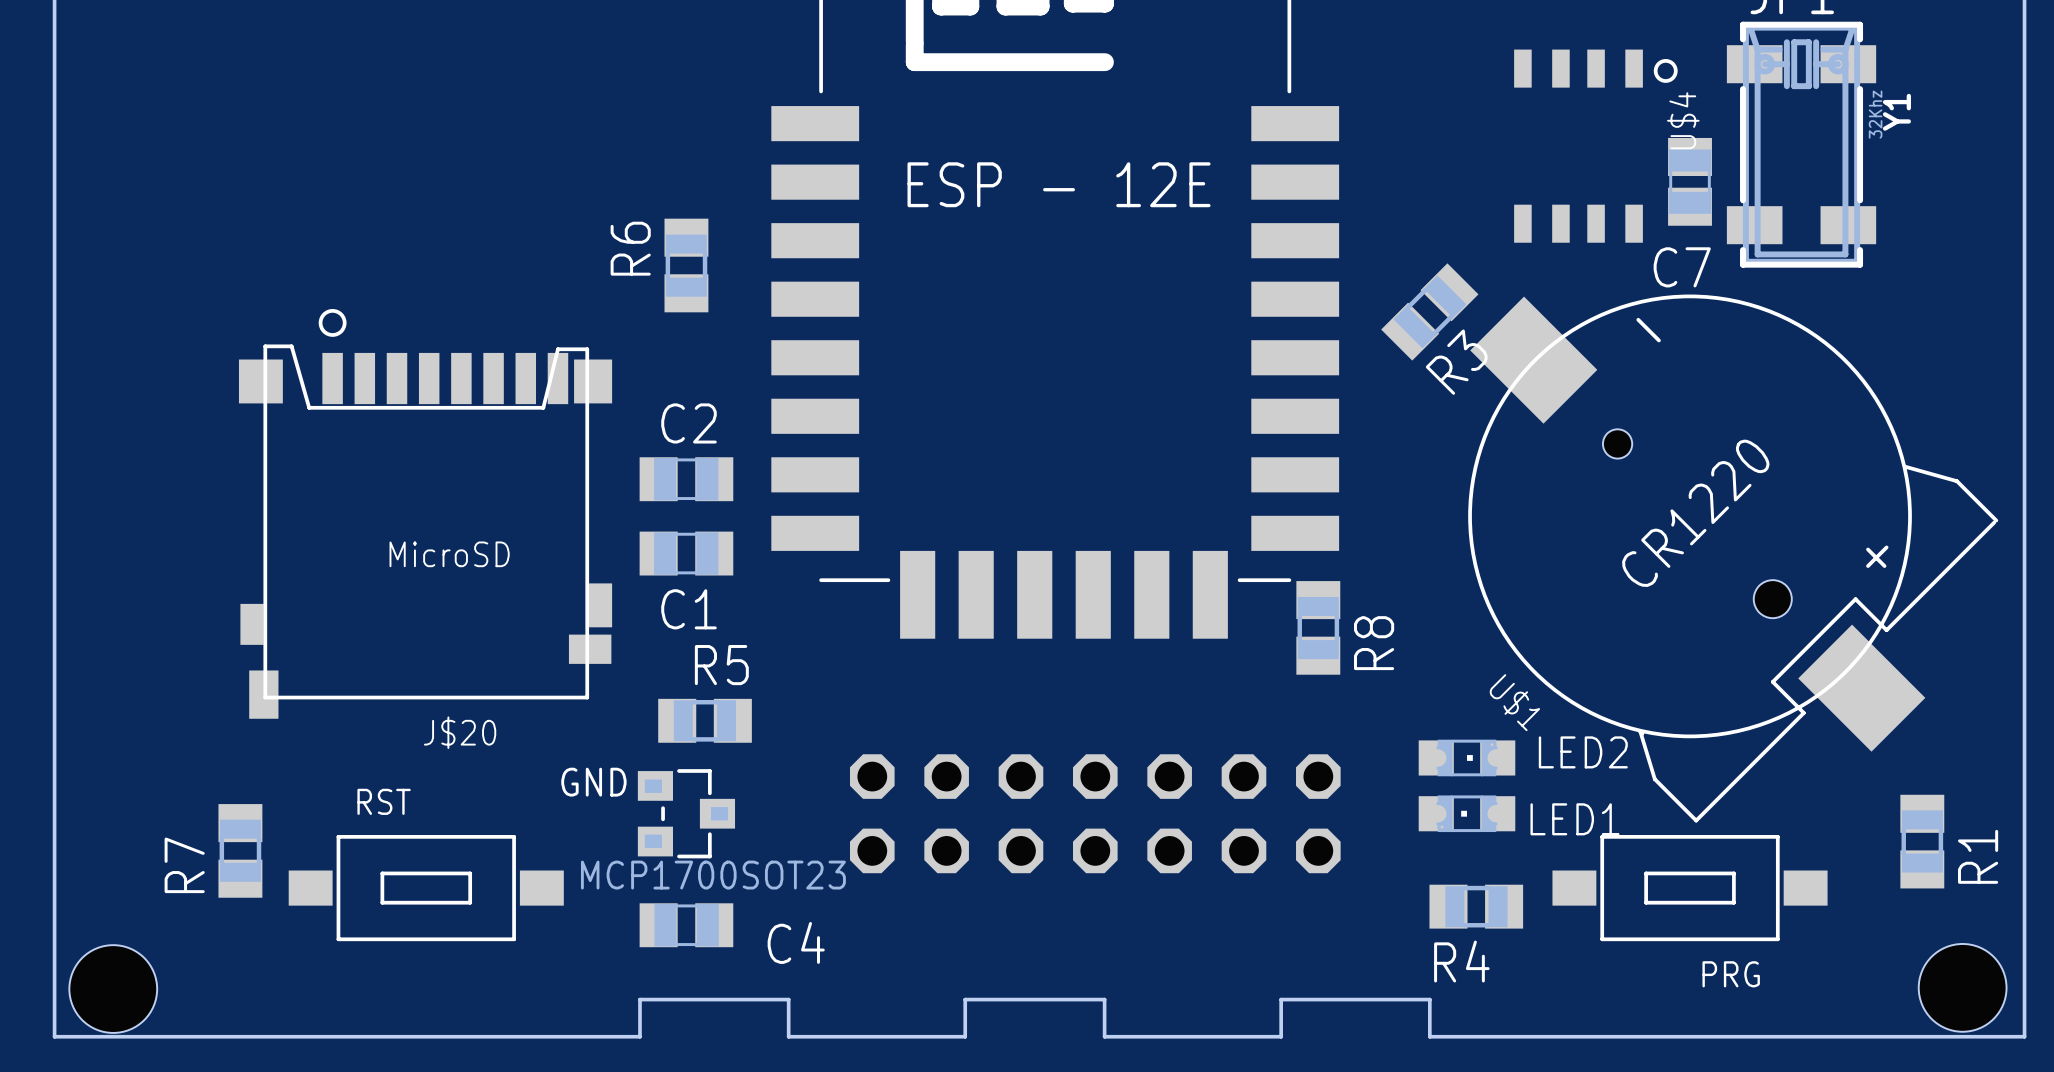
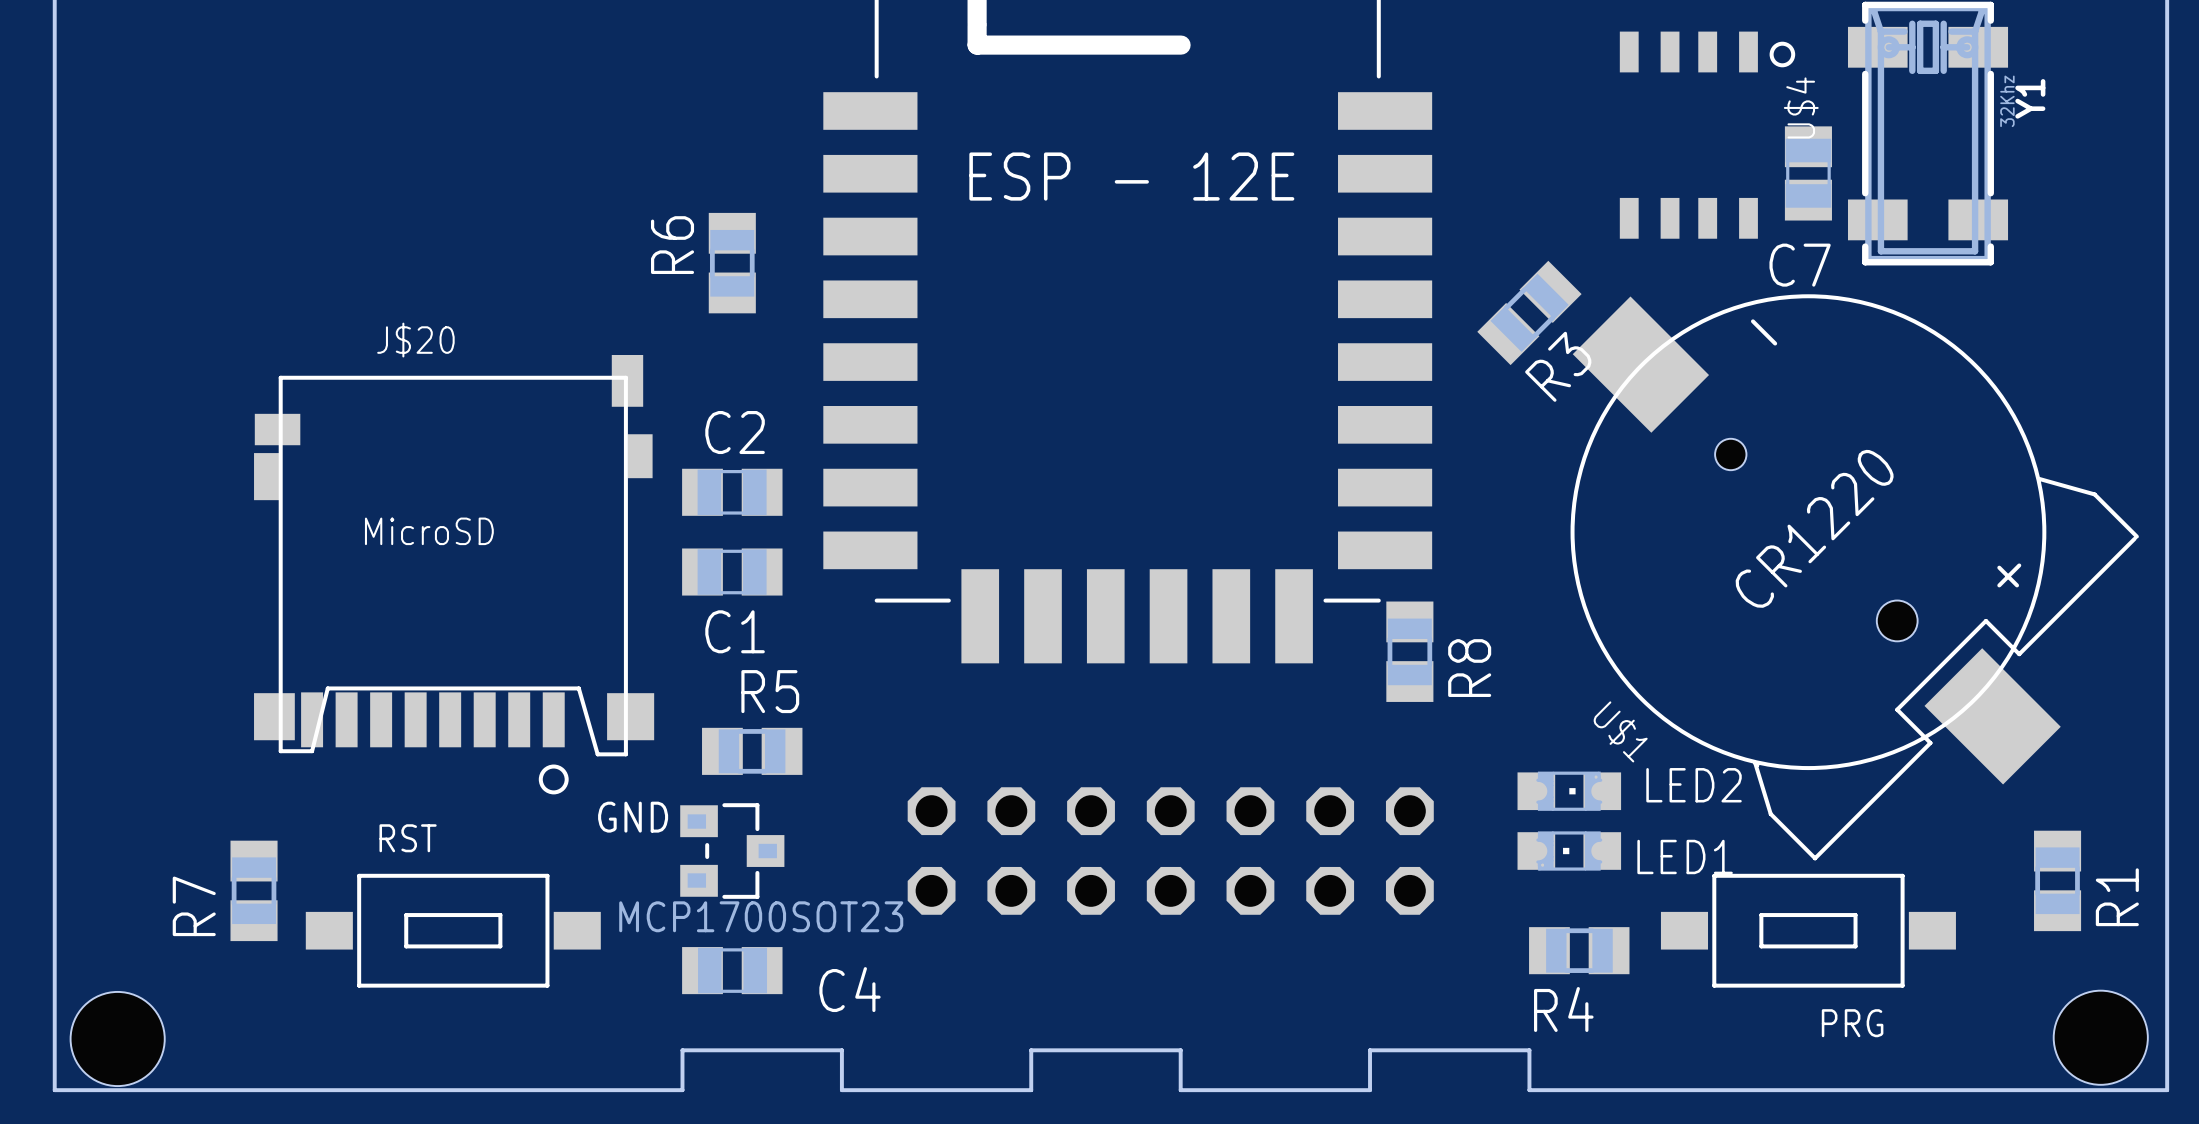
J$20 footprint: [238, 309, 613, 719] -> [254, 355, 655, 795]
J$20 name position: J$20 (460, 732) -> J$20 (415, 340)

